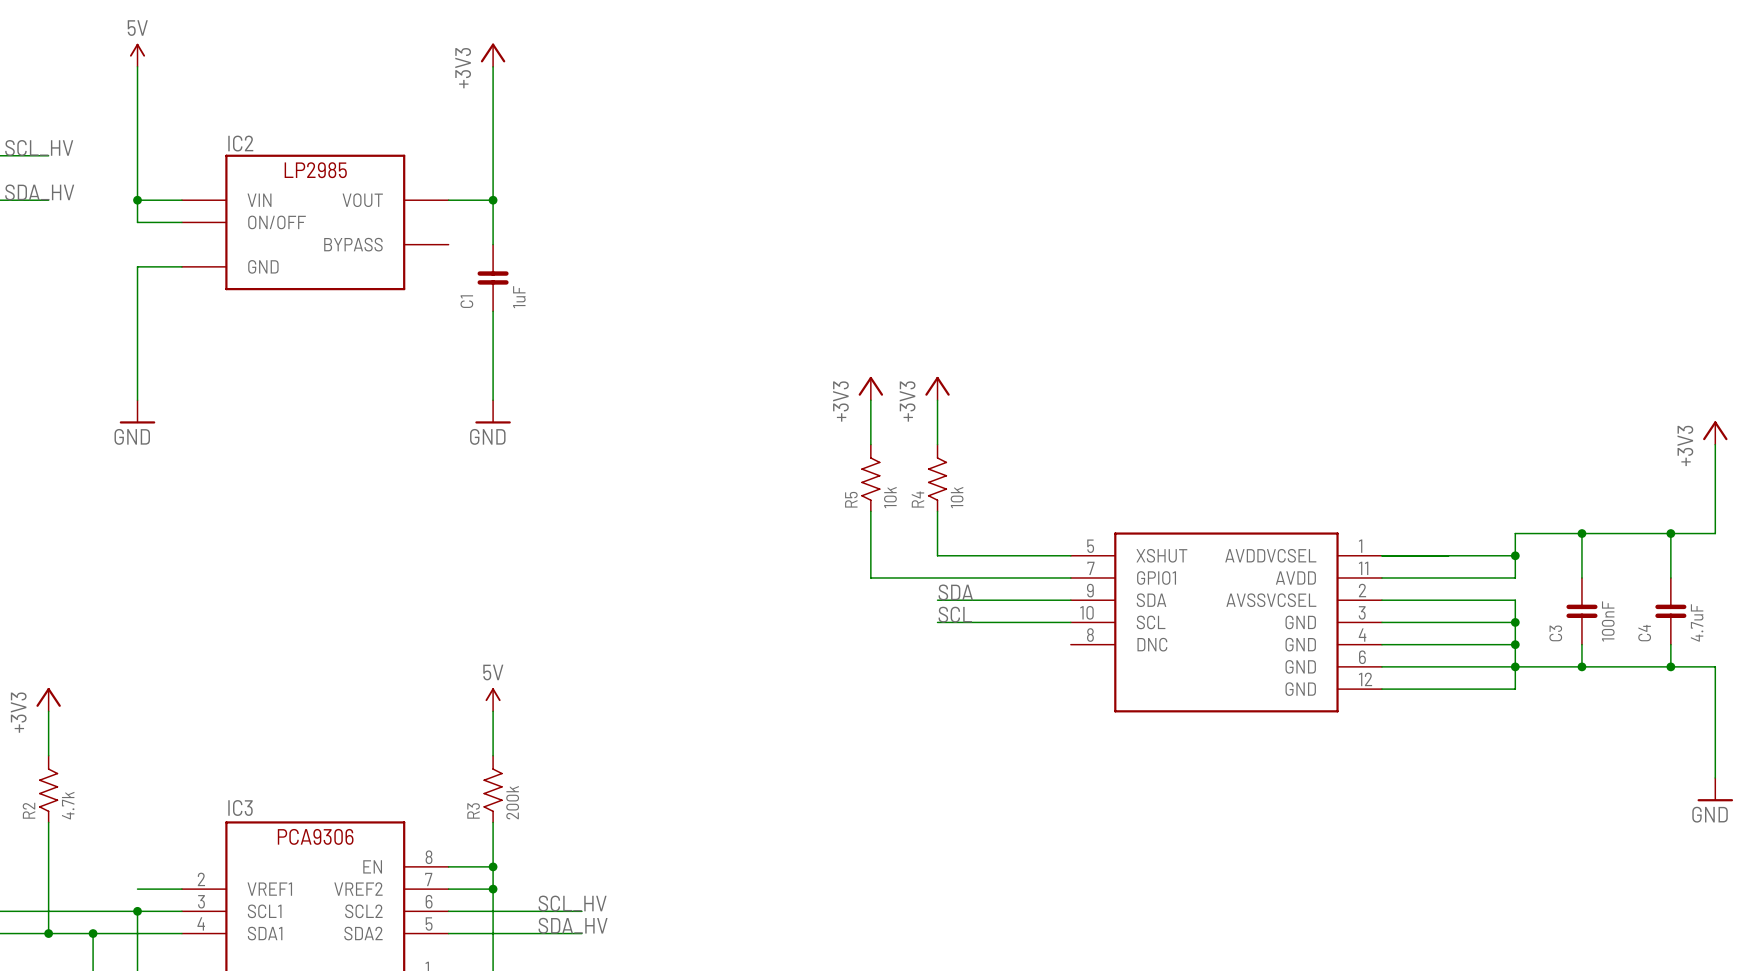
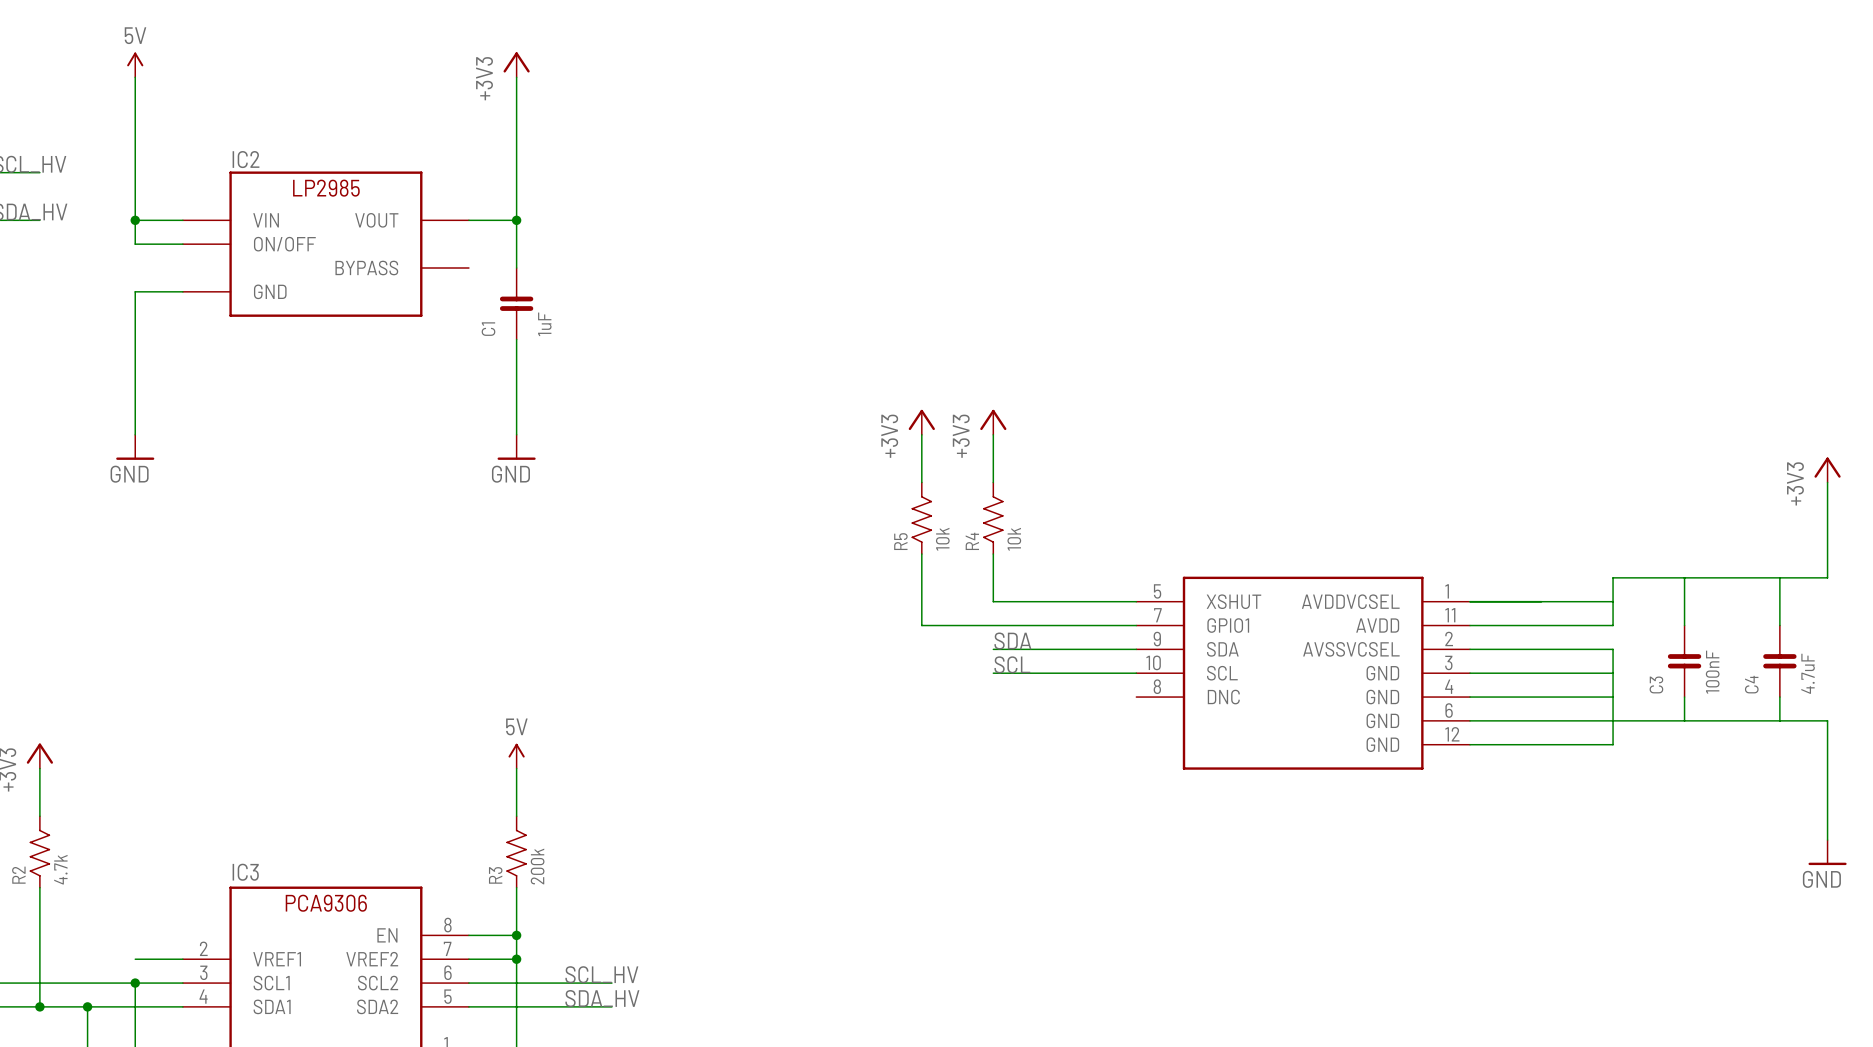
junction: (1581, 533) -> none
junction: (1670, 533) -> none
junction: (1515, 555) -> none
junction: (1515, 622) -> none
junction: (1515, 644) -> none
junction: (1515, 666) -> none
junction: (1581, 666) -> none
junction: (1670, 666) -> none

